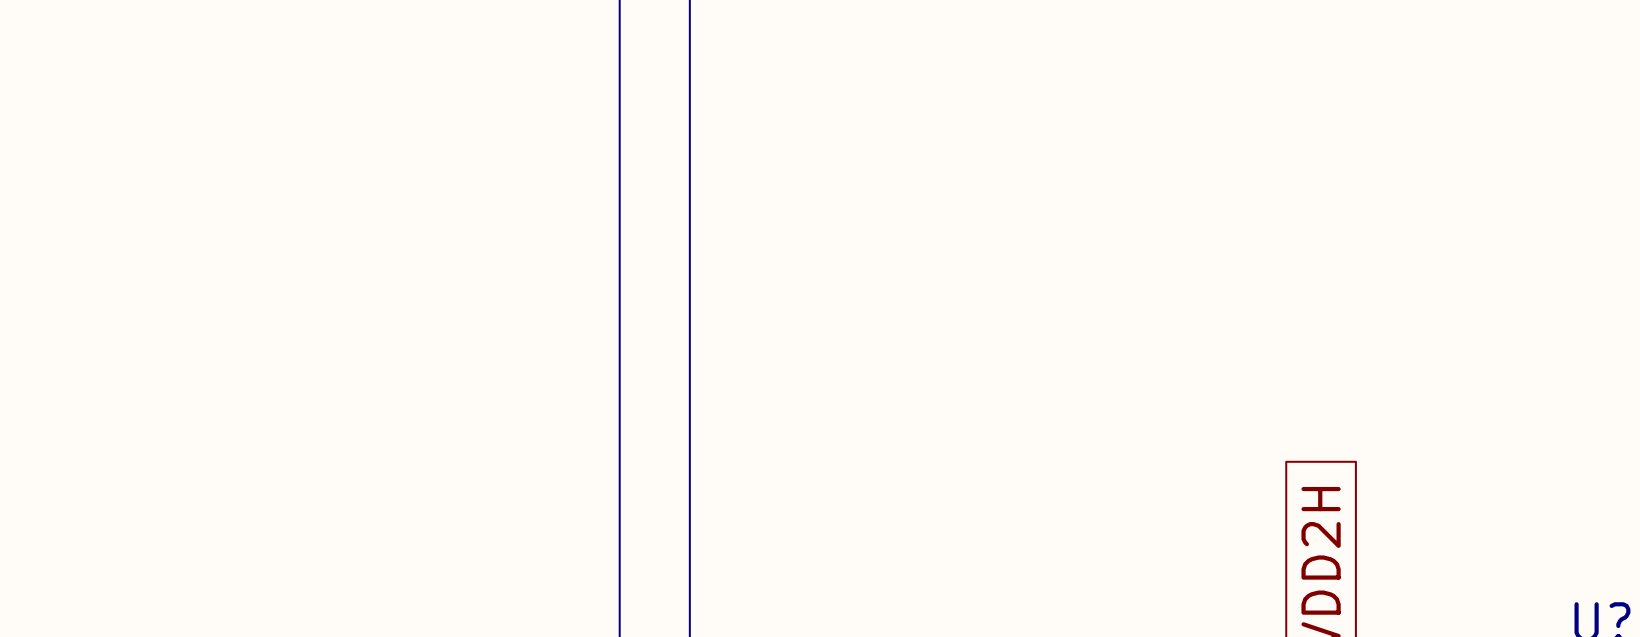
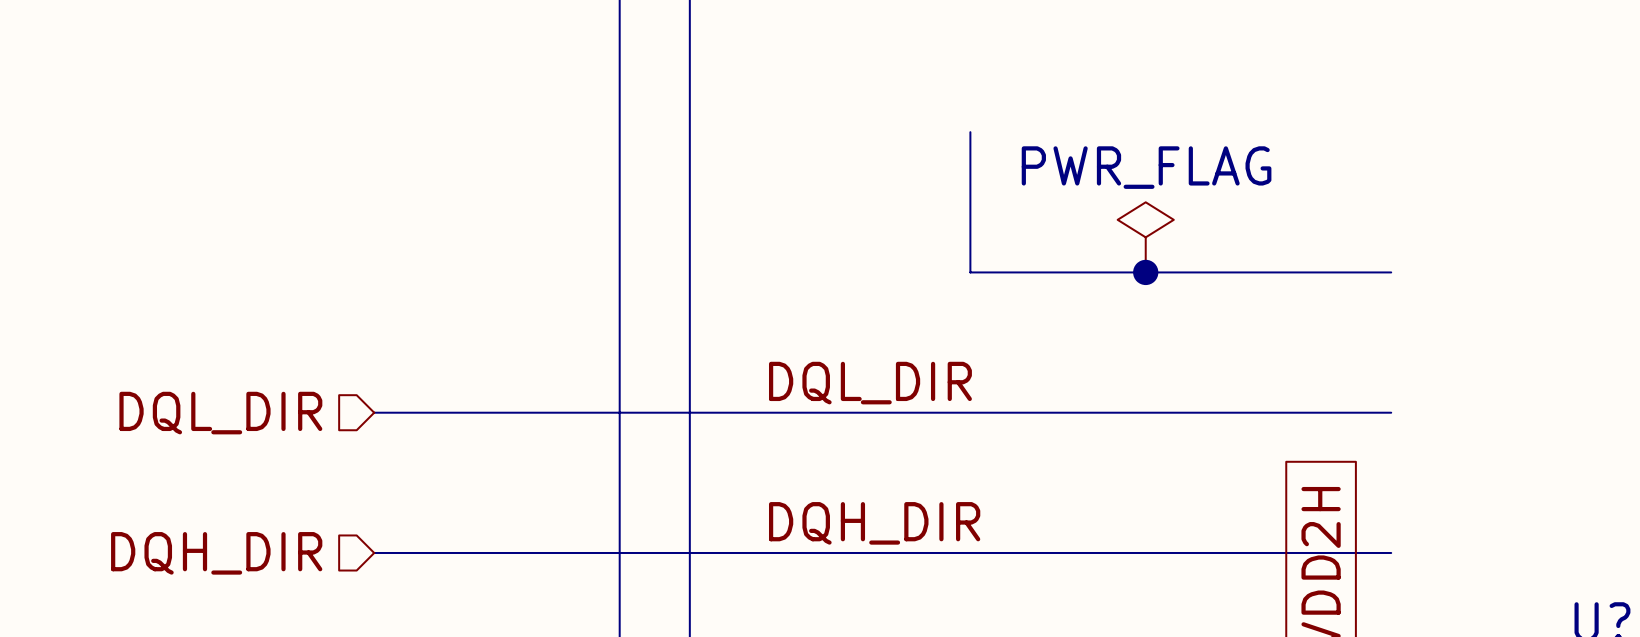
wire: none -> (970, 132) (970, 272) (1391, 272)
power symbol: none -> PWR_FLAG (1145, 237)
junction: none -> (1145, 272)
label: none -> DQL_DIR (870, 383)
wire: none -> (374, 412) (1391, 412)
hierarchical label: none -> DQL_DIR (220, 413)
label: none -> DQH_DIR (874, 523)
wire: none -> (374, 552) (1391, 552)
hierarchical label: none -> DQH_DIR (216, 553)

